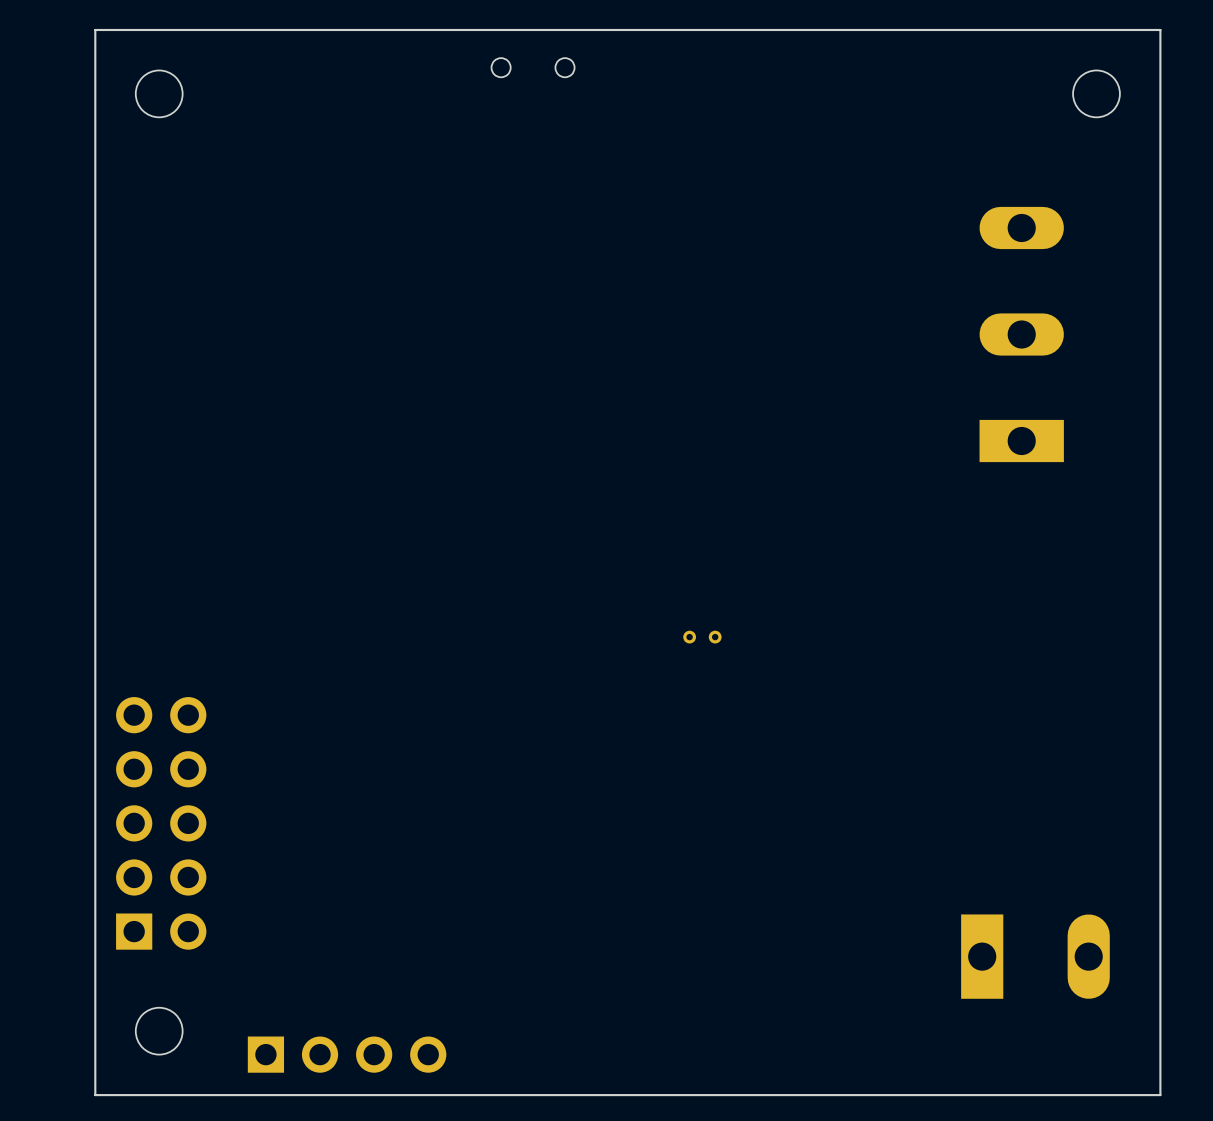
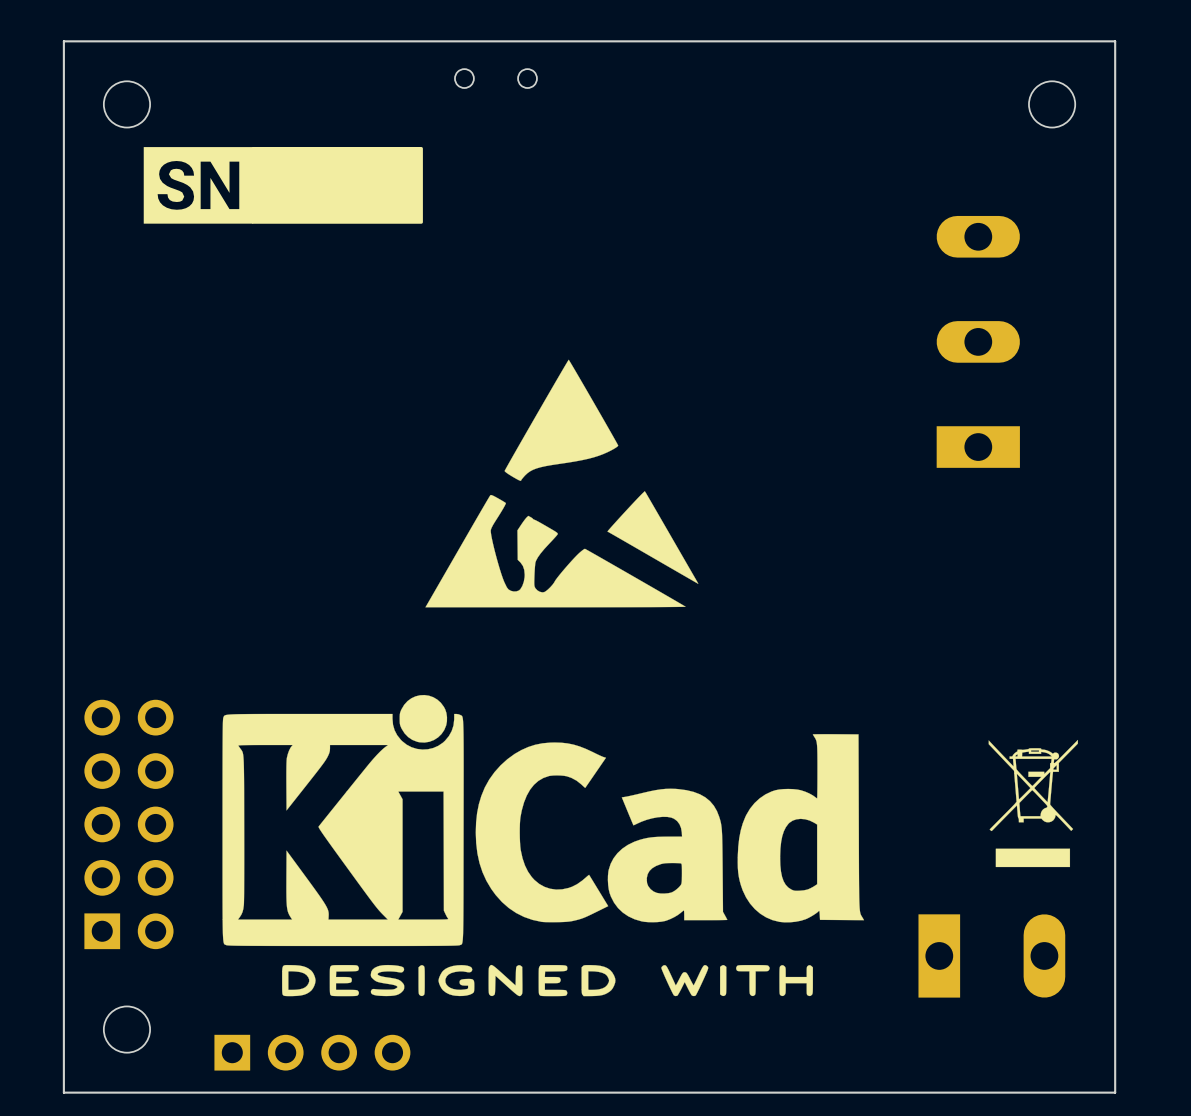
drawing: none -> [143, 147, 423, 224]
drawing: none -> [425, 359, 699, 608]
part: (702, 637) -> none
drawing: none -> [222, 694, 865, 997]
drawing: none -> [988, 739, 1078, 868]

